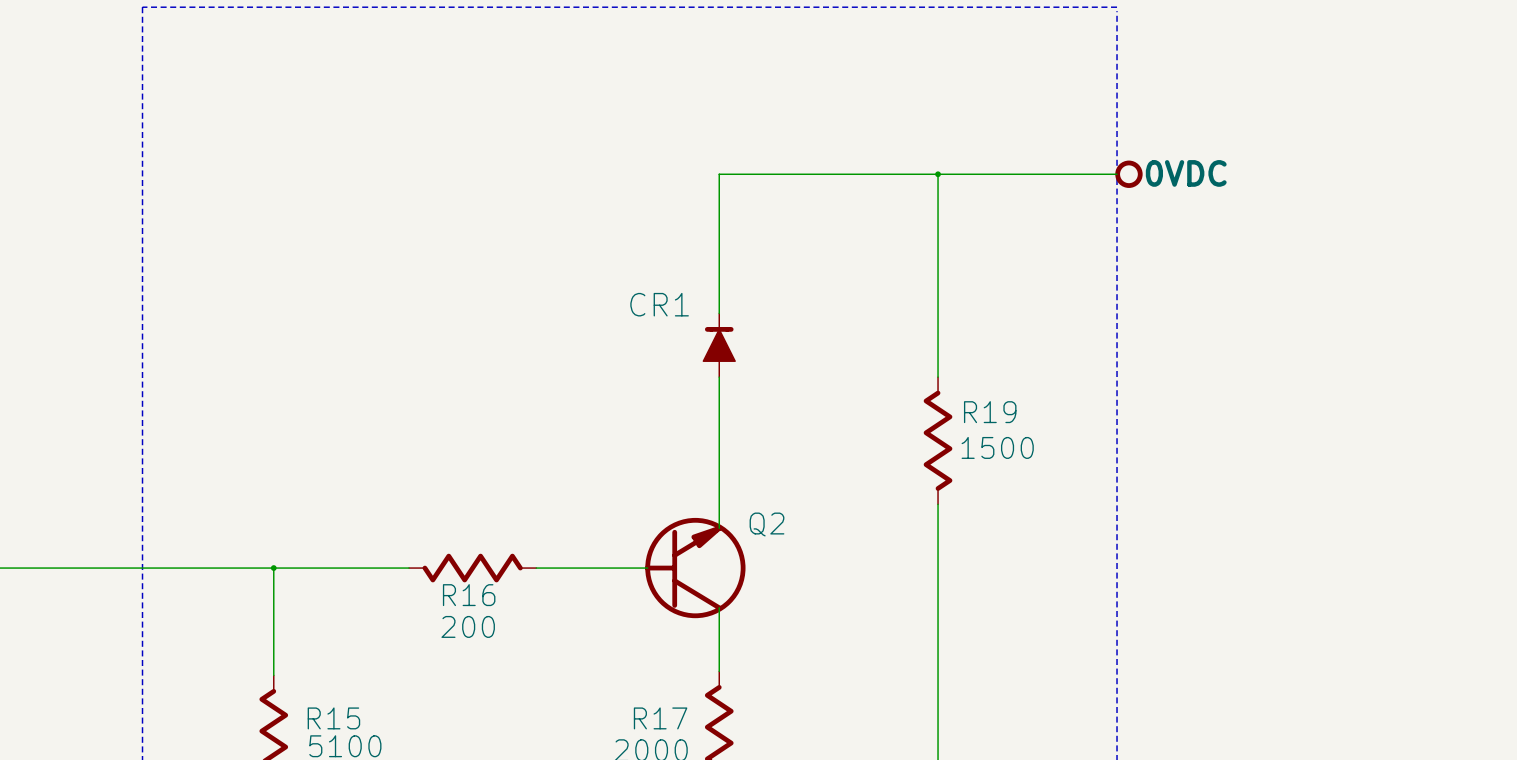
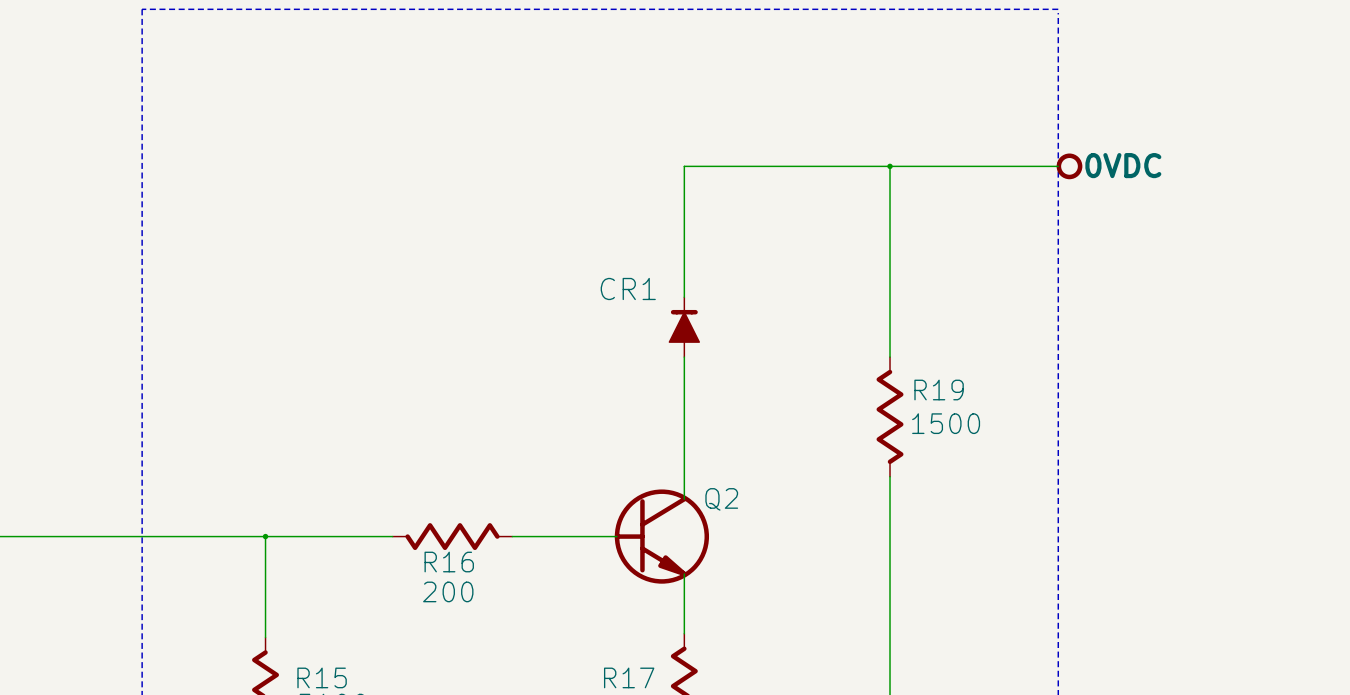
Q2 flip: as is (695, 568) -> up-down (661, 536)

